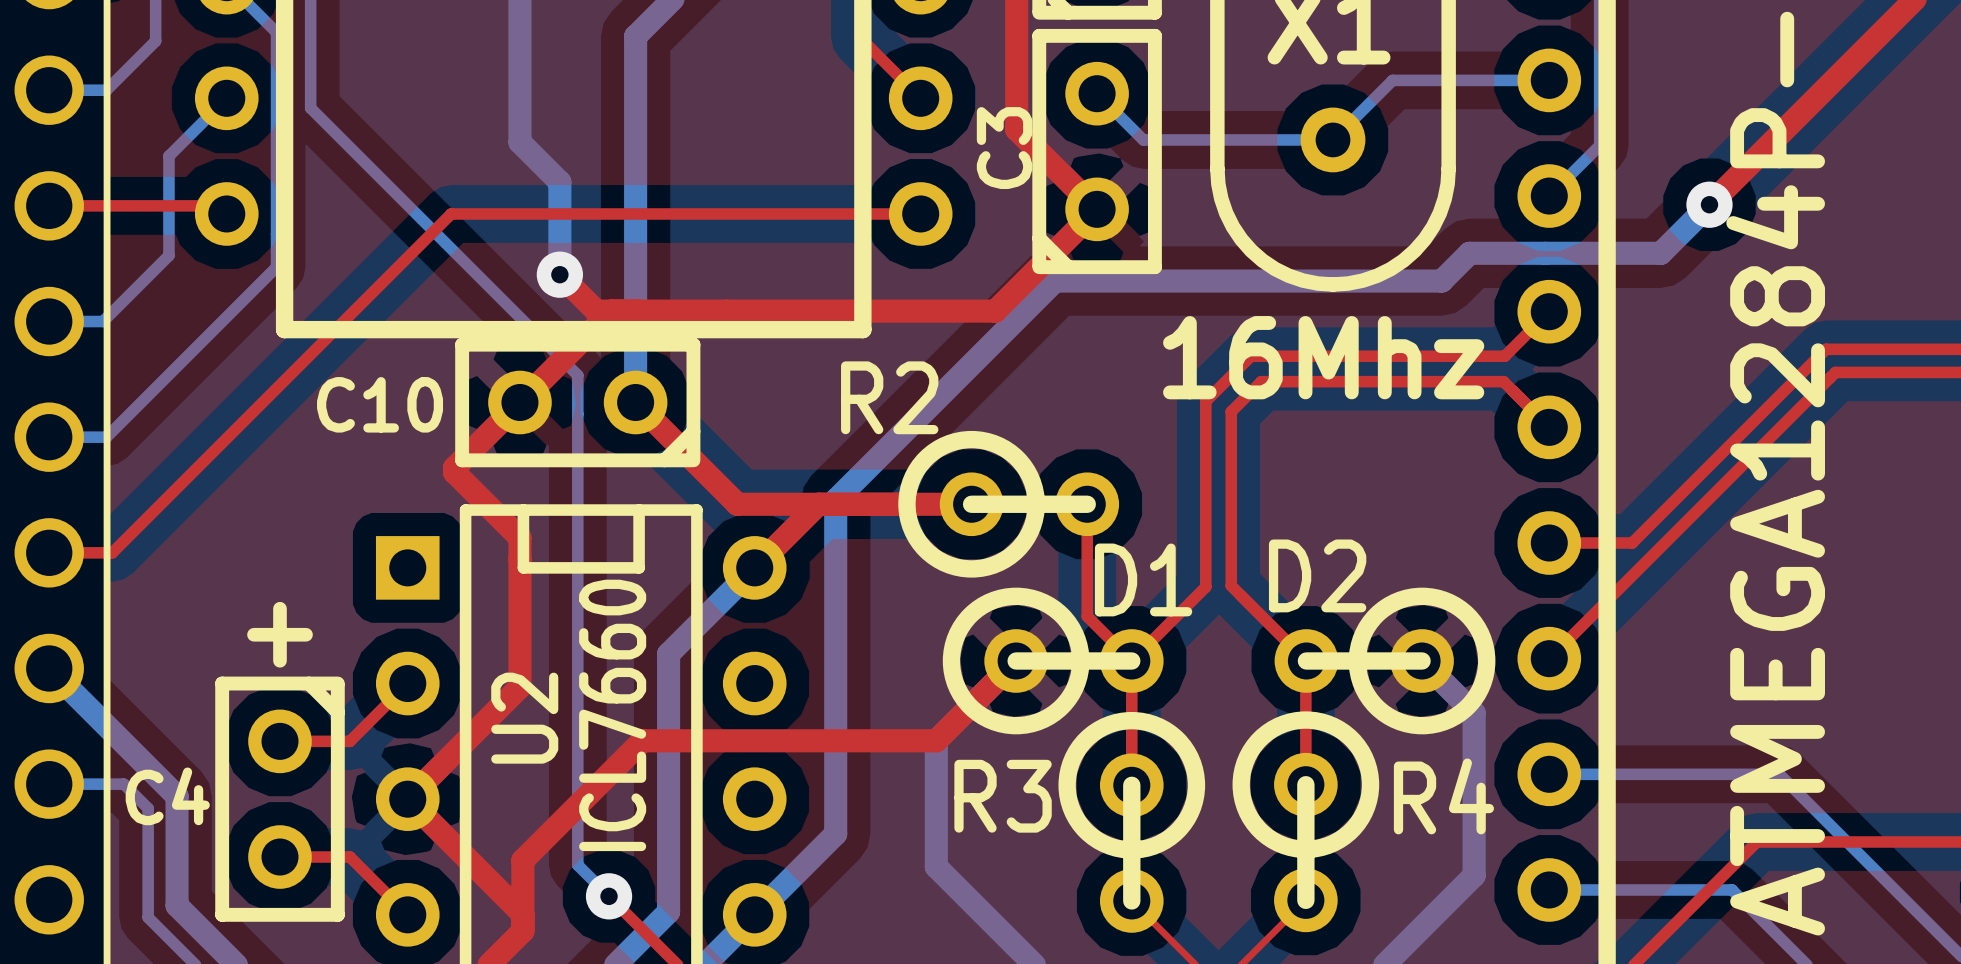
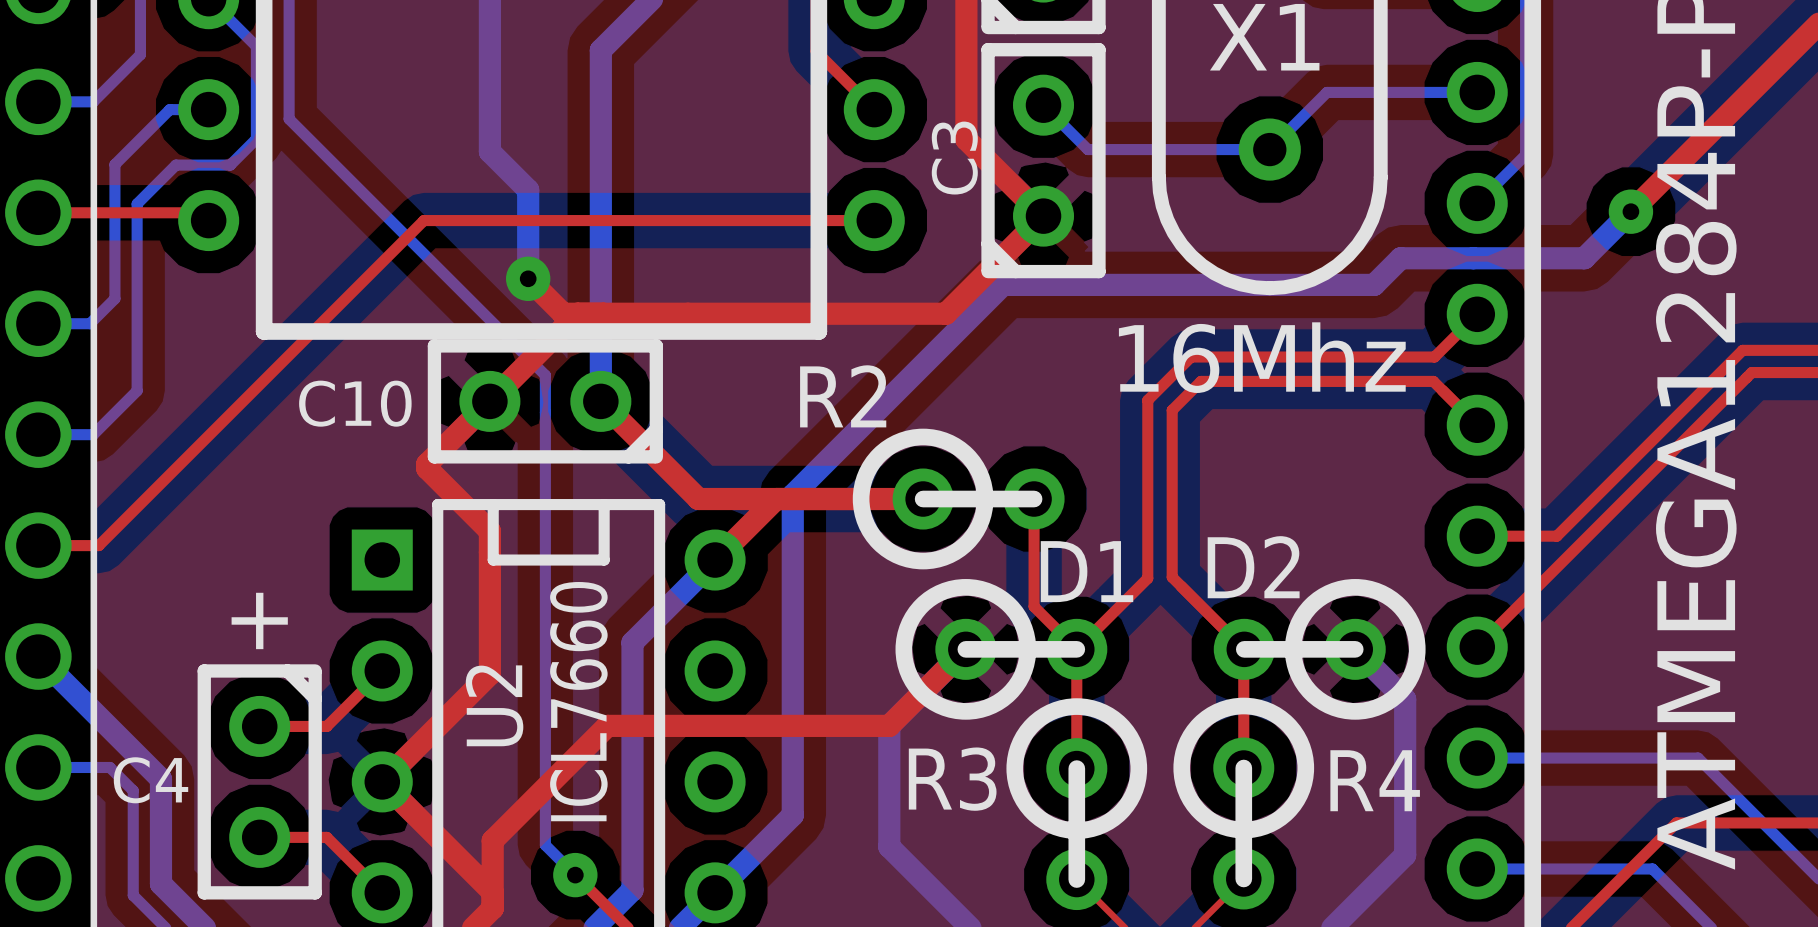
bottom track: (226, 98) (168, 156) (168, 255) (129, 295) -> (208, 109) (169, 109) (114, 164) (114, 298)
bottom track: (276, 128) (276, 267) (152, 391) -> (256, 138) (230, 165) (175, 165) (137, 203) (137, 390)

